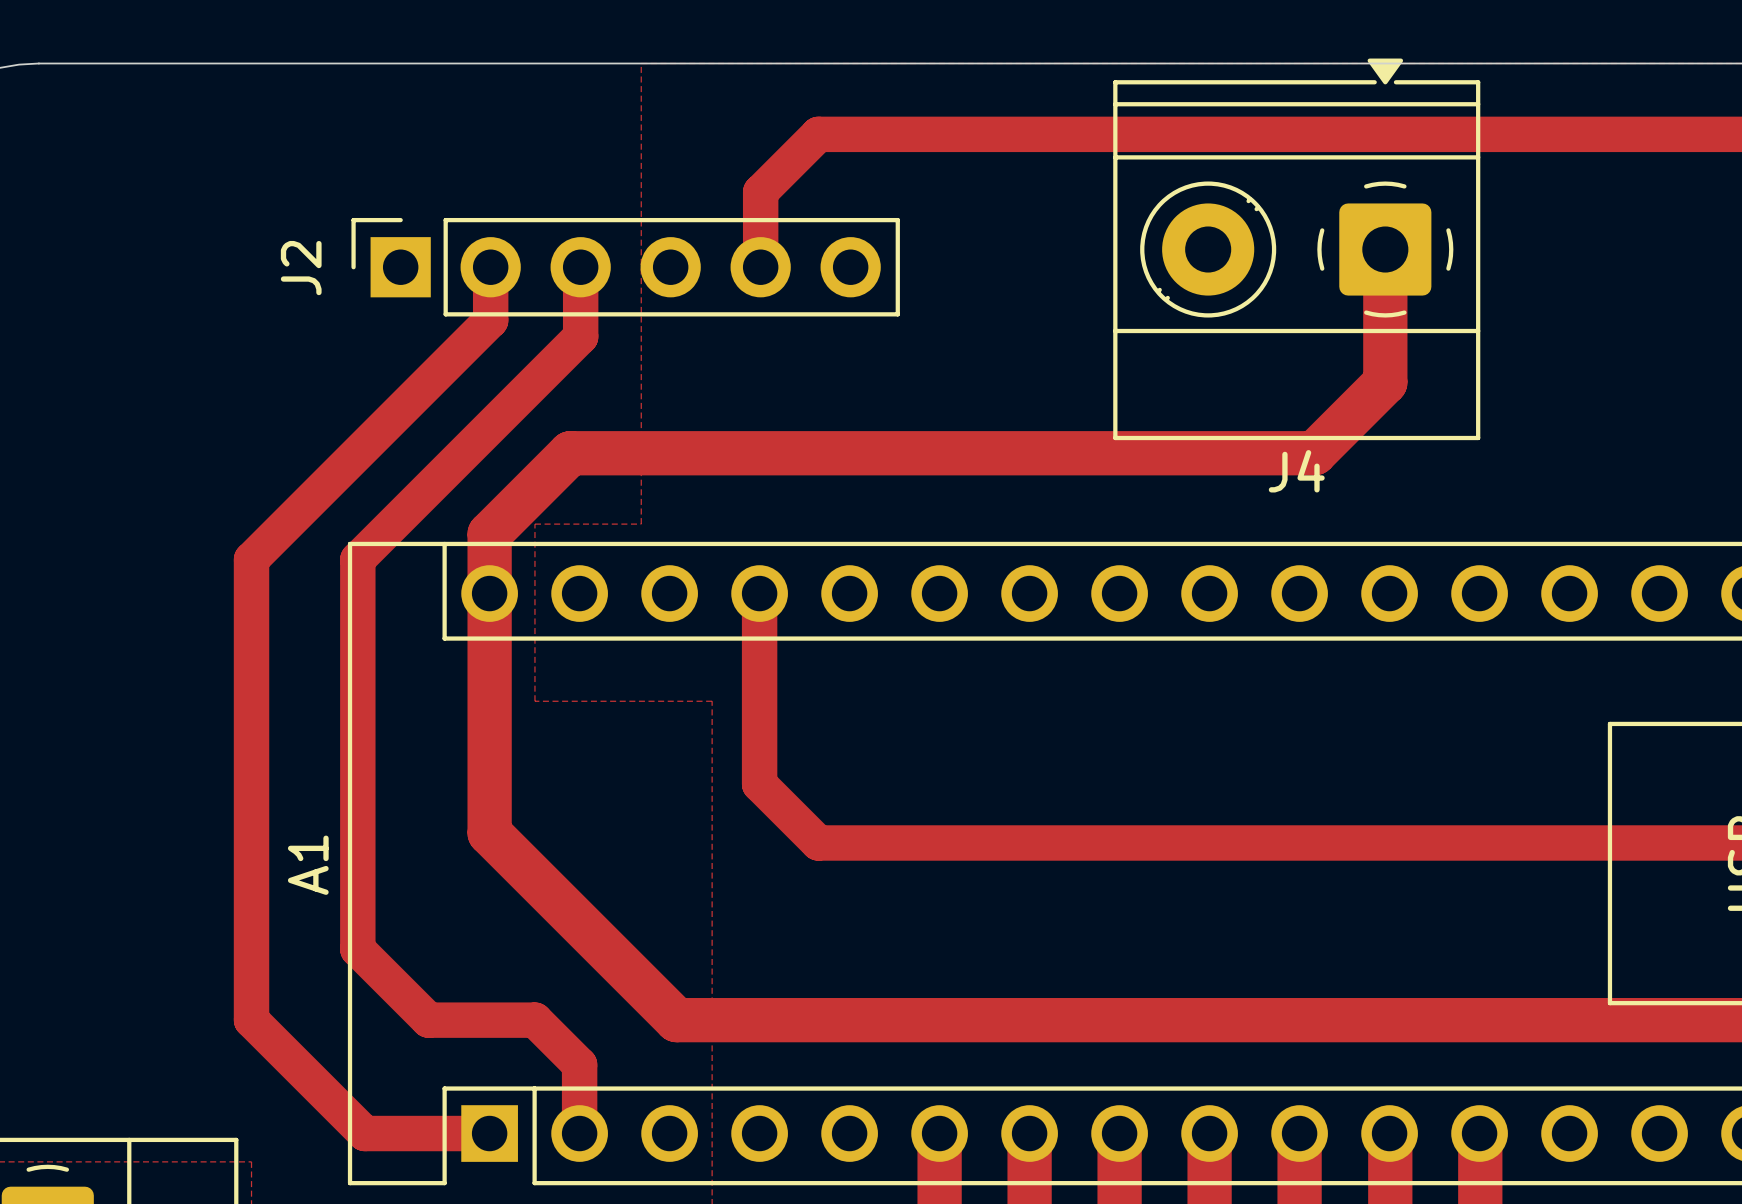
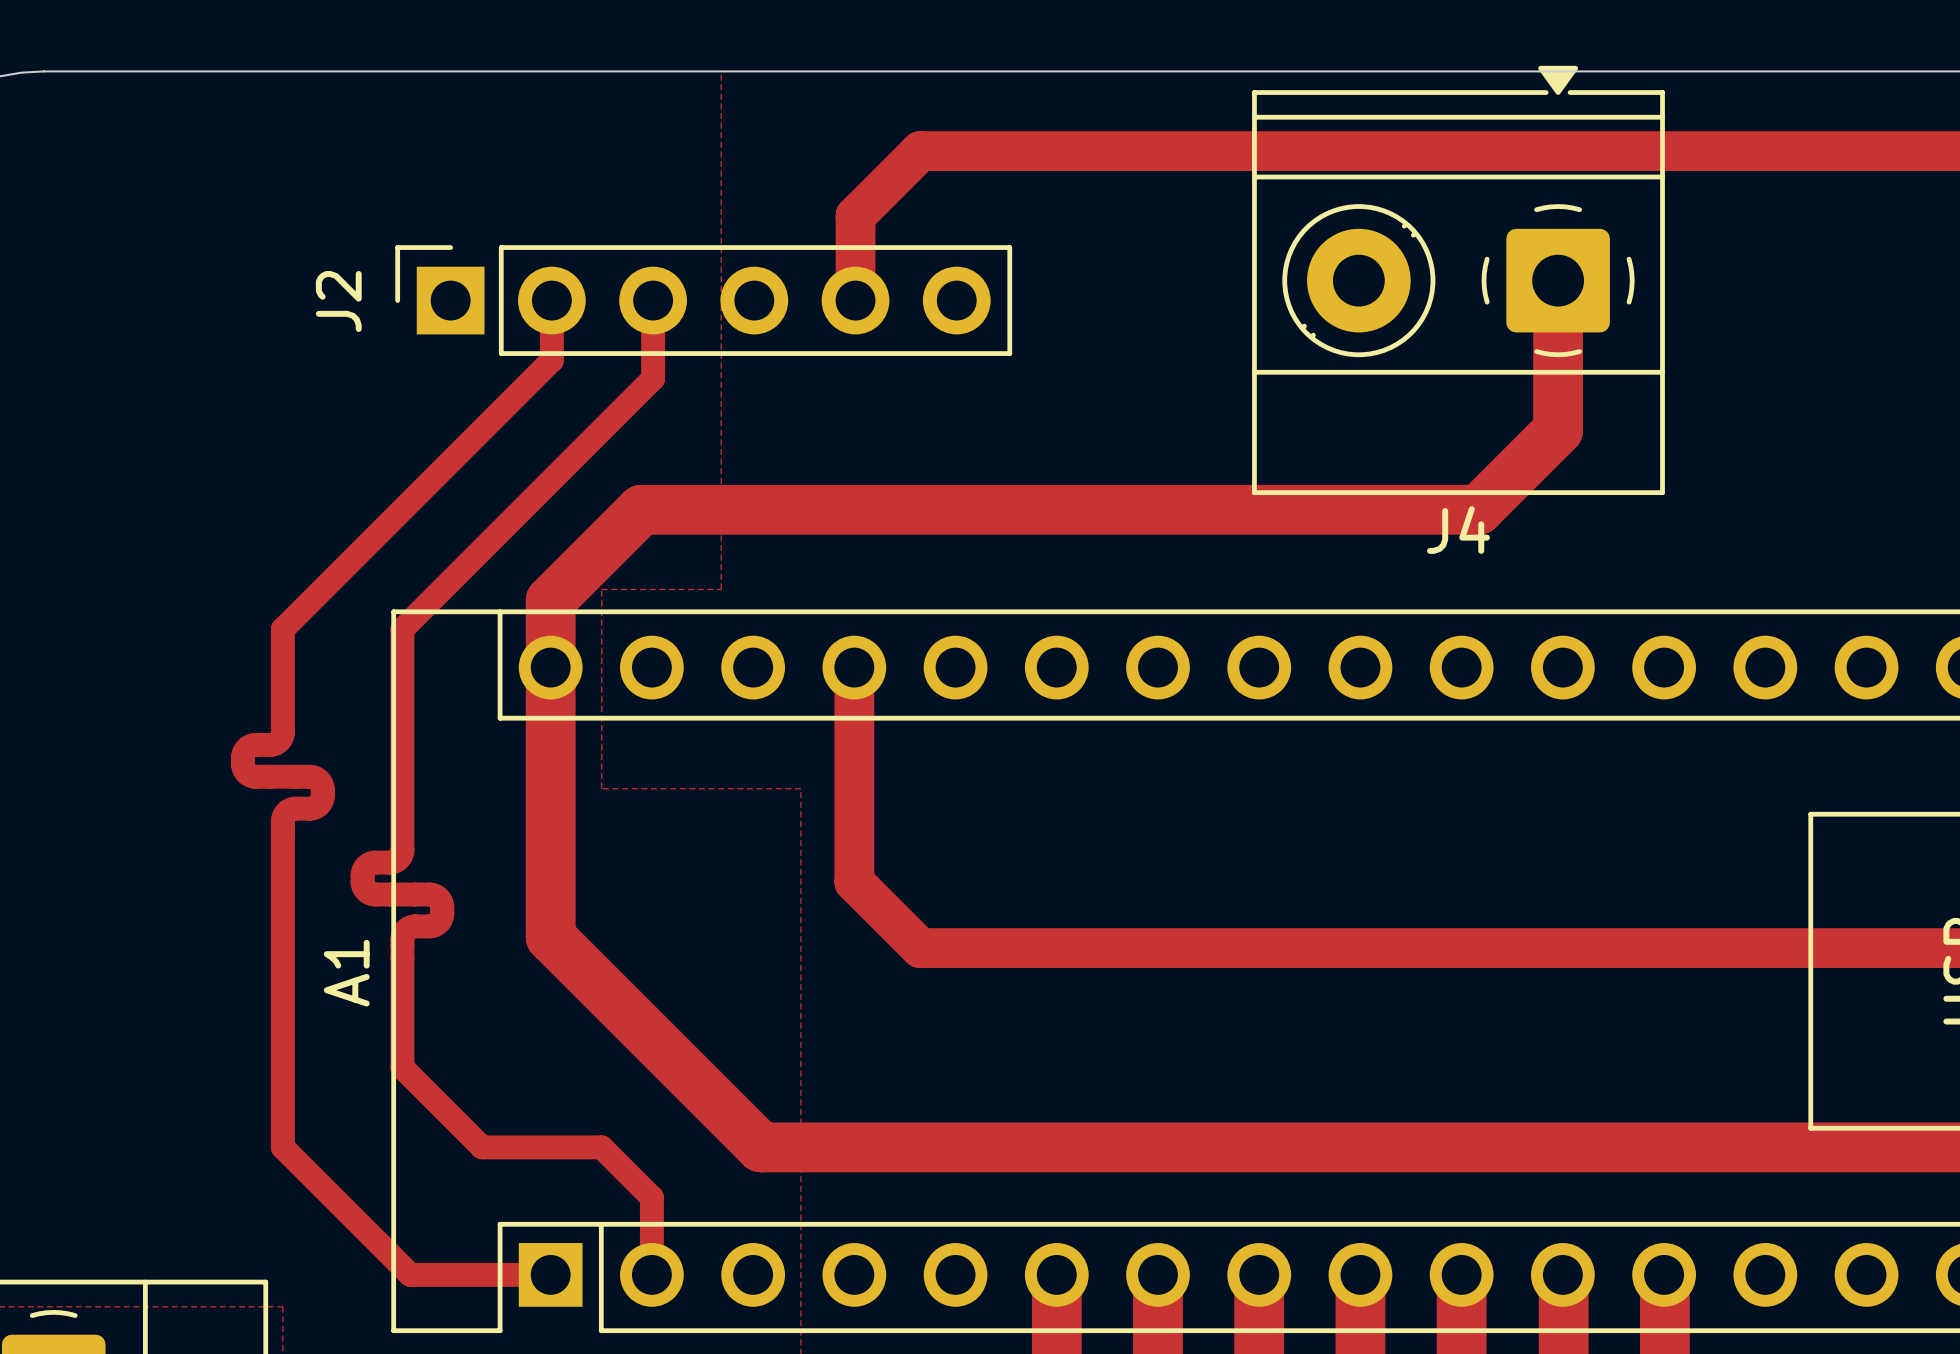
top track width: thick (490, 267) (490, 320) (251, 559) (251, 650) -> thin (551, 300) (551, 360) (282, 629) (282, 732)
top track width: thick (580, 267) (580, 336) (357, 559) (357, 755) -> thin (653, 300) (653, 378) (402, 629) (402, 849)
top track: (251, 650) (251, 730) -> (282, 732) (281, 738) (276, 743) (250, 745) (245, 749) (243, 757) (244, 770) (252, 776) (311, 776) (321, 783) (322, 797) (319, 804) (311, 808) (290, 809) (285, 813) (282, 821)
top track width: thick (251, 730) (251, 1020) (364, 1133) (489, 1133) -> thin (282, 821) (282, 1147) (410, 1274) (550, 1274)
top track: (357, 755) (357, 834) -> (402, 849) (400, 856) (394, 861) (368, 864) (364, 869) (362, 875) (364, 888) (372, 894) (431, 894) (440, 900) (442, 915) (438, 922) (431, 926) (410, 927) (404, 932) (402, 939)
top track width: thick (357, 834) (357, 949) (428, 1020) (534, 1020) (579, 1064) (579, 1133) -> thin (402, 939) (402, 1067) (482, 1147) (601, 1147) (651, 1197) (651, 1274)

